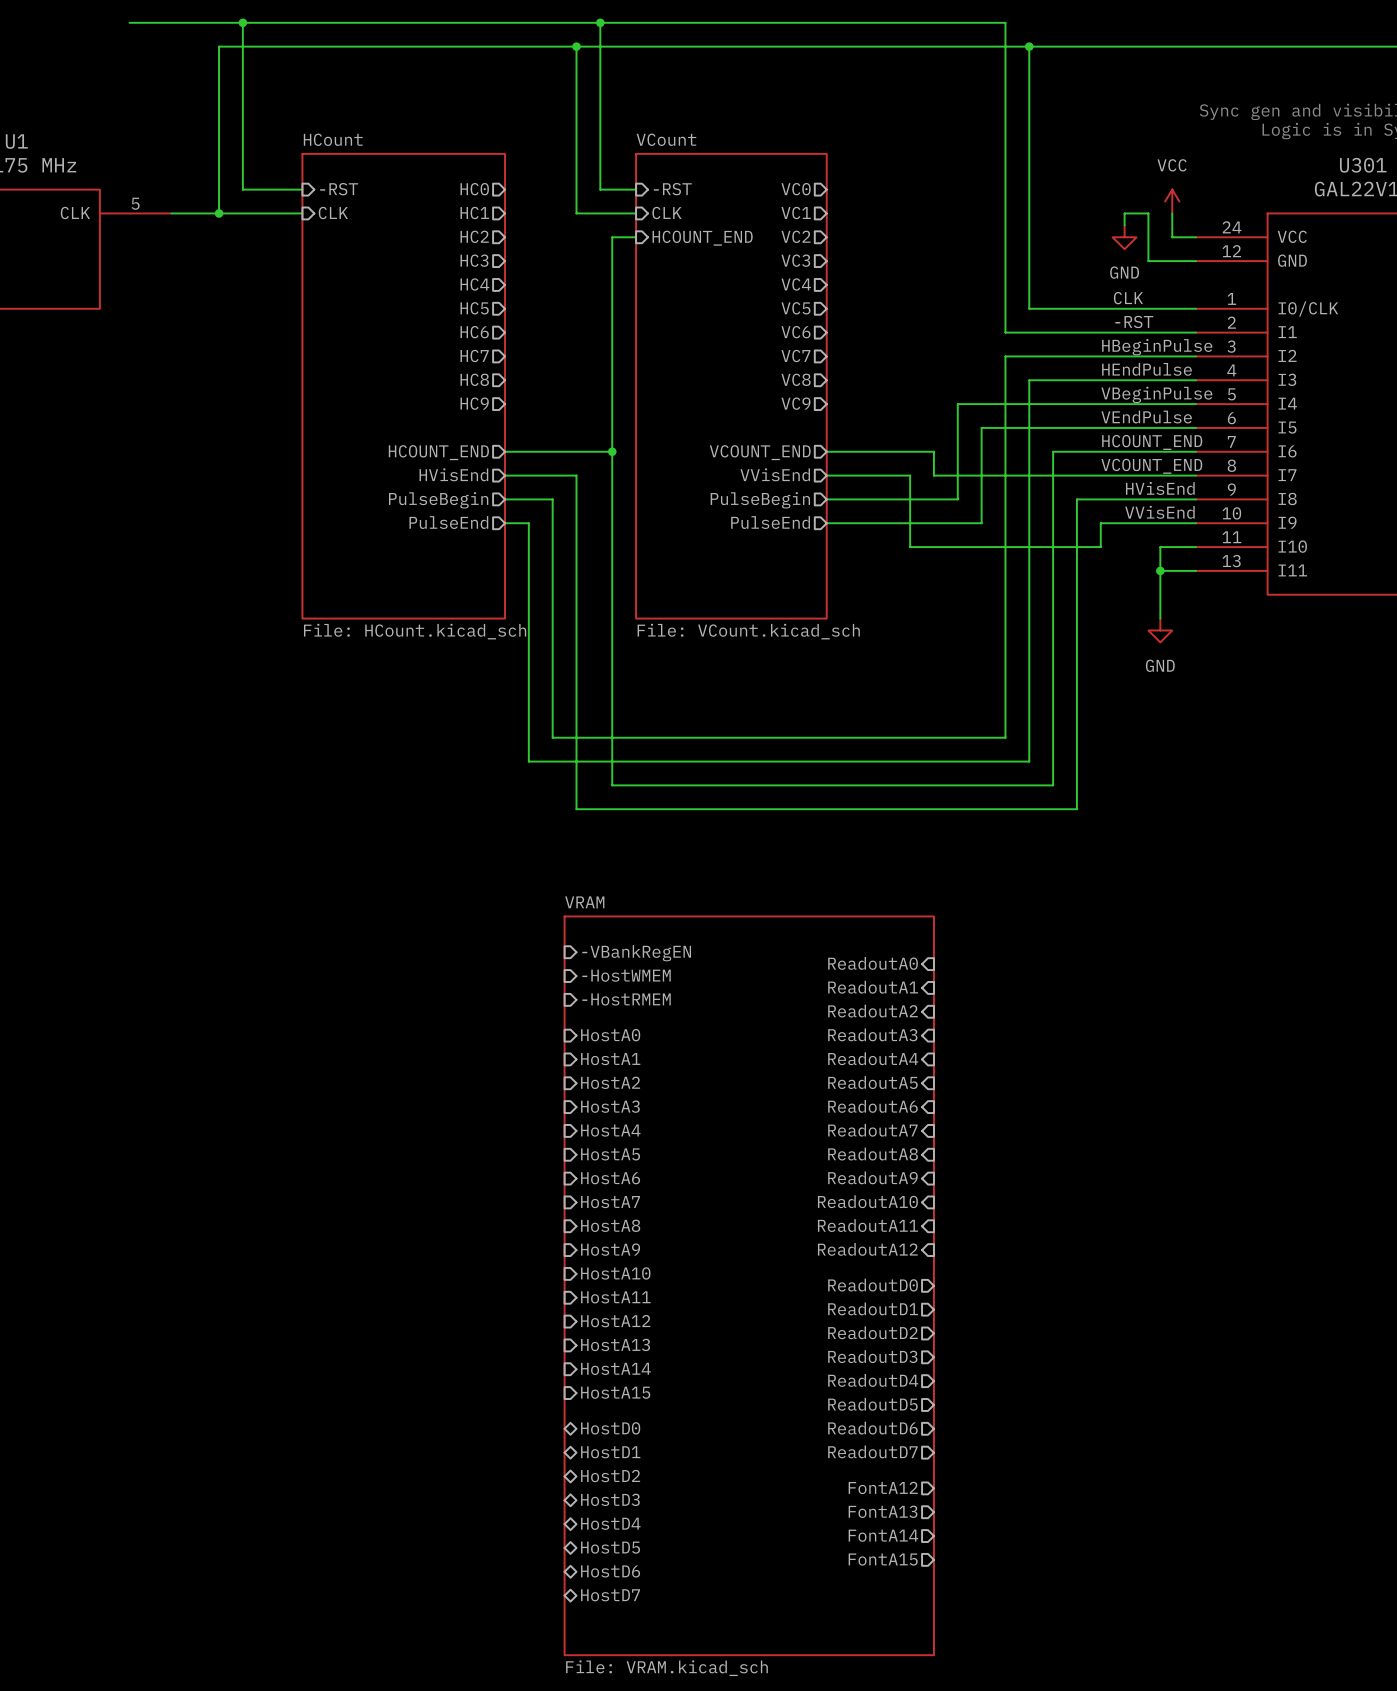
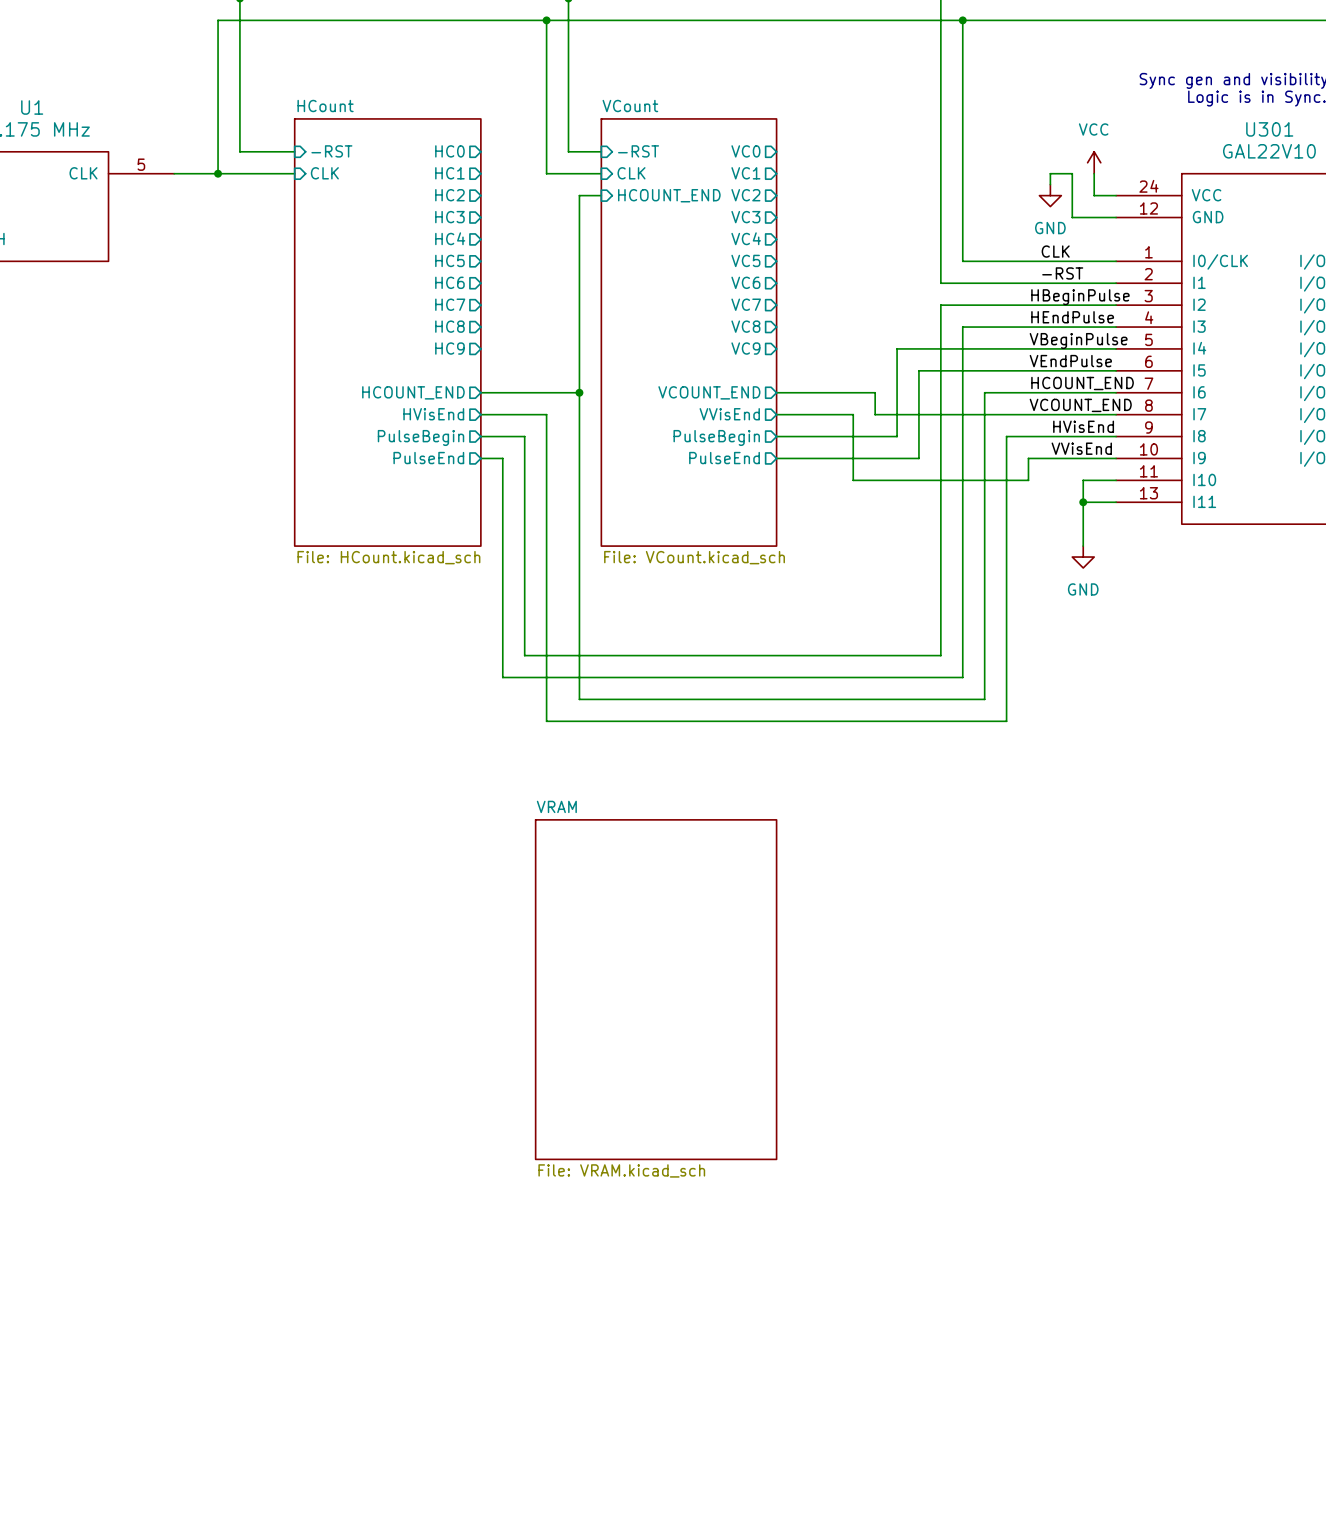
sheet pin: -VBankRegEN (636, 953) -> none
sheet pin: ReadoutA0 (873, 963) -> none
sheet pin: -HostWMEM (626, 975) -> none
sheet pin: ReadoutA1 (873, 987) -> none
sheet pin: -HostRMEM (626, 999) -> none
sheet pin: ReadoutA2 (872, 1011) -> none
sheet pin: ReadoutA3 (872, 1034) -> none
sheet pin: HostA0 (610, 1035) -> none
sheet pin: ReadoutA4 (873, 1058) -> none
sheet pin: HostA1 (610, 1059) -> none
sheet pin: HostA2 (610, 1082) -> none
sheet pin: ReadoutA5 (872, 1082) -> none
sheet VRAM: none -> File: VRAM.kicad_sch (656, 989)
sheet pin: HostA3 (610, 1106) -> none
sheet pin: ReadoutA6 (872, 1106) -> none
sheet pin: HostA4 (610, 1130) -> none
sheet pin: ReadoutA7 (872, 1130) -> none
sheet pin: HostA5 (610, 1154) -> none
sheet pin: ReadoutA8 (873, 1154) -> none
sheet pin: ReadoutA9 (872, 1177) -> none
sheet pin: HostA6 (610, 1178) -> none
sheet pin: ReadoutA10 (867, 1201) -> none
sheet pin: HostA7 (610, 1202) -> none
sheet pin: HostA8 (610, 1225) -> none
sheet pin: ReadoutA11 (867, 1225) -> none
sheet pin: HostA9 (610, 1249) -> none
sheet pin: ReadoutA12 (867, 1249) -> none
sheet pin: HostA10 (615, 1273) -> none
sheet VRAM: File: VRAM.kicad_sch (749, 1285) -> none
sheet pin: ReadoutD0 (873, 1285) -> none
sheet pin: HostA11 (615, 1297) -> none
sheet pin: ReadoutD1 (873, 1308) -> none
sheet pin: HostA12 (615, 1321) -> none
sheet pin: ReadoutD2 (872, 1332) -> none
sheet pin: HostA13 (615, 1344) -> none
sheet pin: ReadoutD3 (872, 1356) -> none
sheet pin: HostA14 (615, 1368) -> none
sheet pin: ReadoutD4 (873, 1380) -> none
sheet pin: HostA15 (615, 1392) -> none
sheet pin: ReadoutD5 (872, 1404) -> none
sheet pin: HostD0 (610, 1428) -> none
sheet pin: ReadoutD6 (872, 1428) -> none
sheet pin: ReadoutD7 (872, 1451) -> none
sheet pin: HostD1 (610, 1452) -> none
sheet pin: HostD2 (610, 1476) -> none
sheet pin: FontA12 (883, 1487) -> none
sheet pin: HostD3 (610, 1499) -> none
sheet pin: FontA13 (883, 1511) -> none
sheet pin: HostD4 (610, 1523) -> none
sheet pin: FontA14 (883, 1535) -> none
sheet pin: HostD5 (610, 1547) -> none
sheet pin: FontA15 (883, 1559) -> none
sheet pin: HostD6 (610, 1571) -> none
sheet pin: HostD7 (610, 1595) -> none

